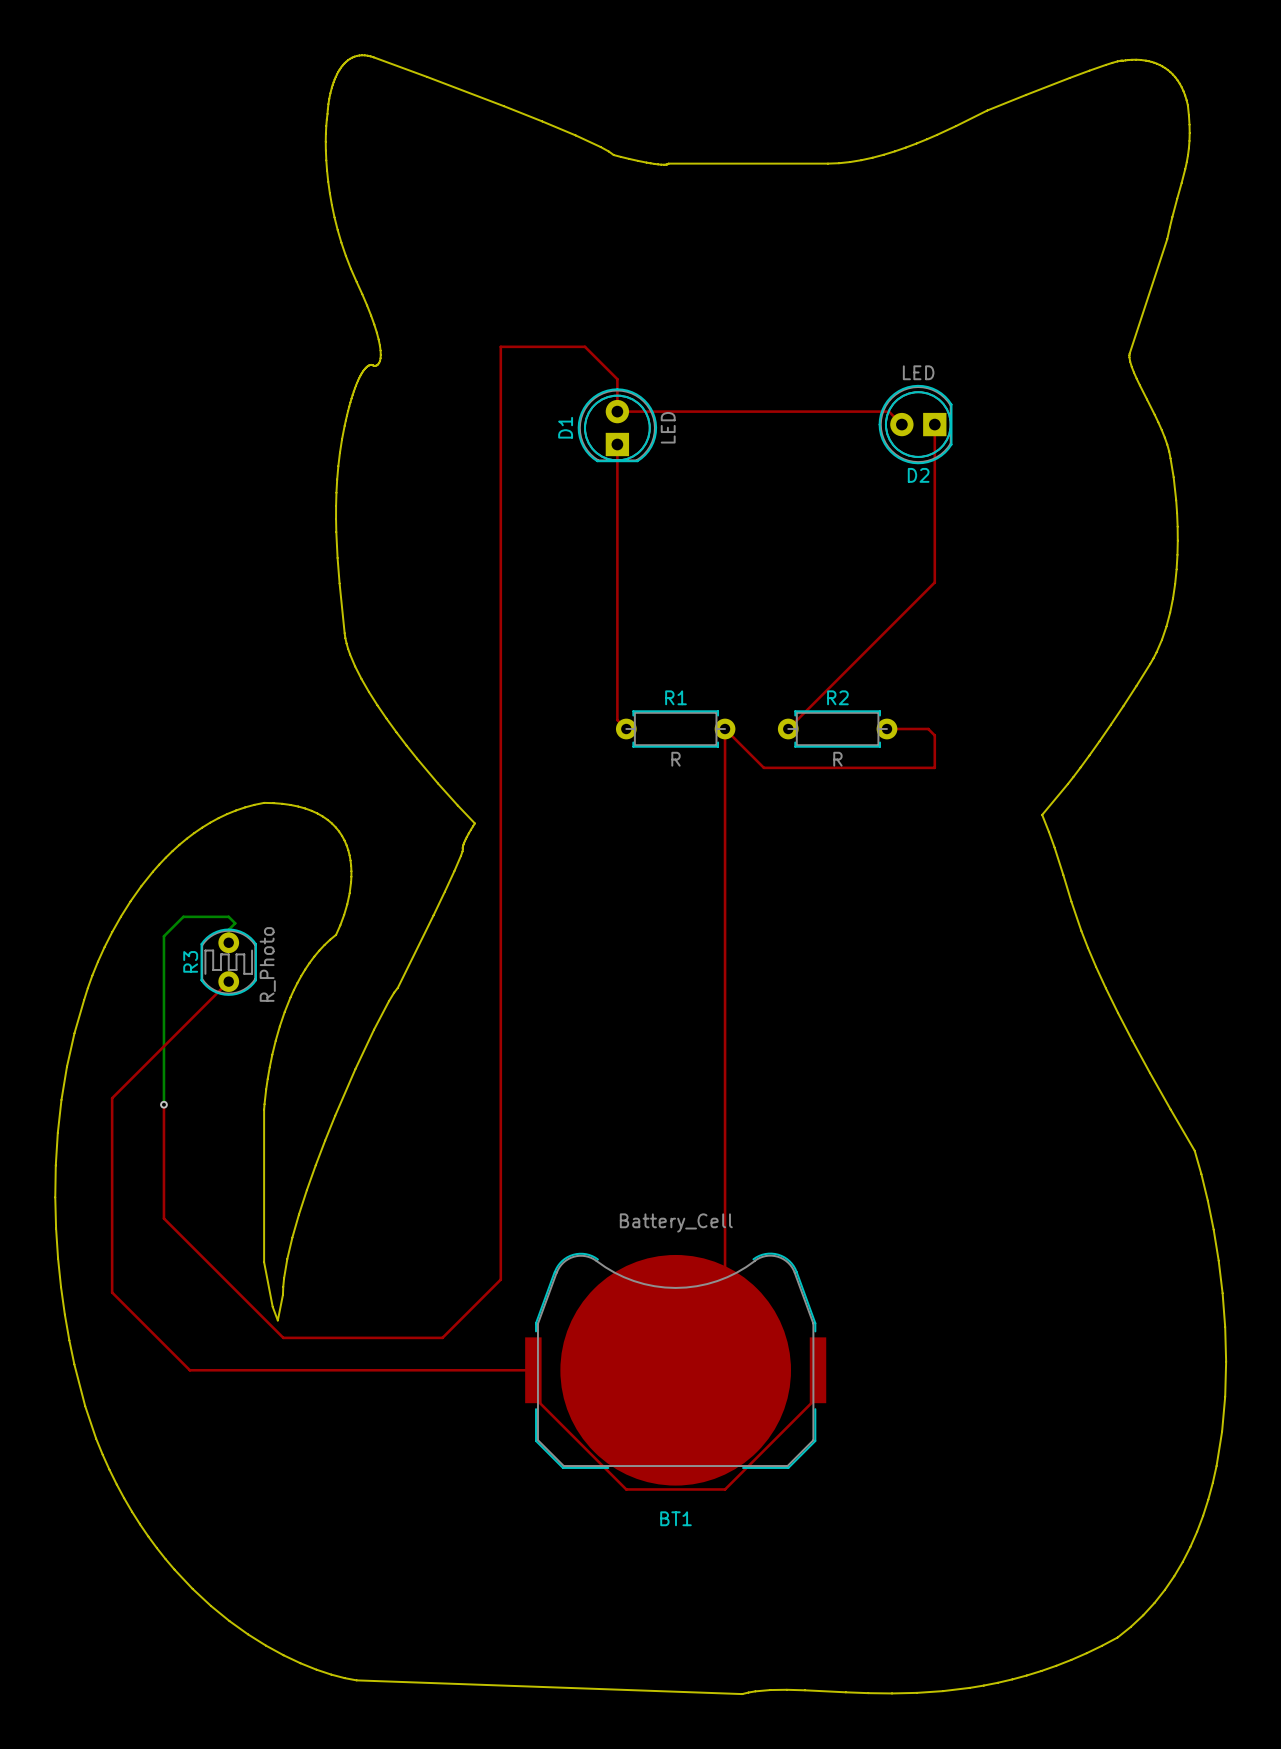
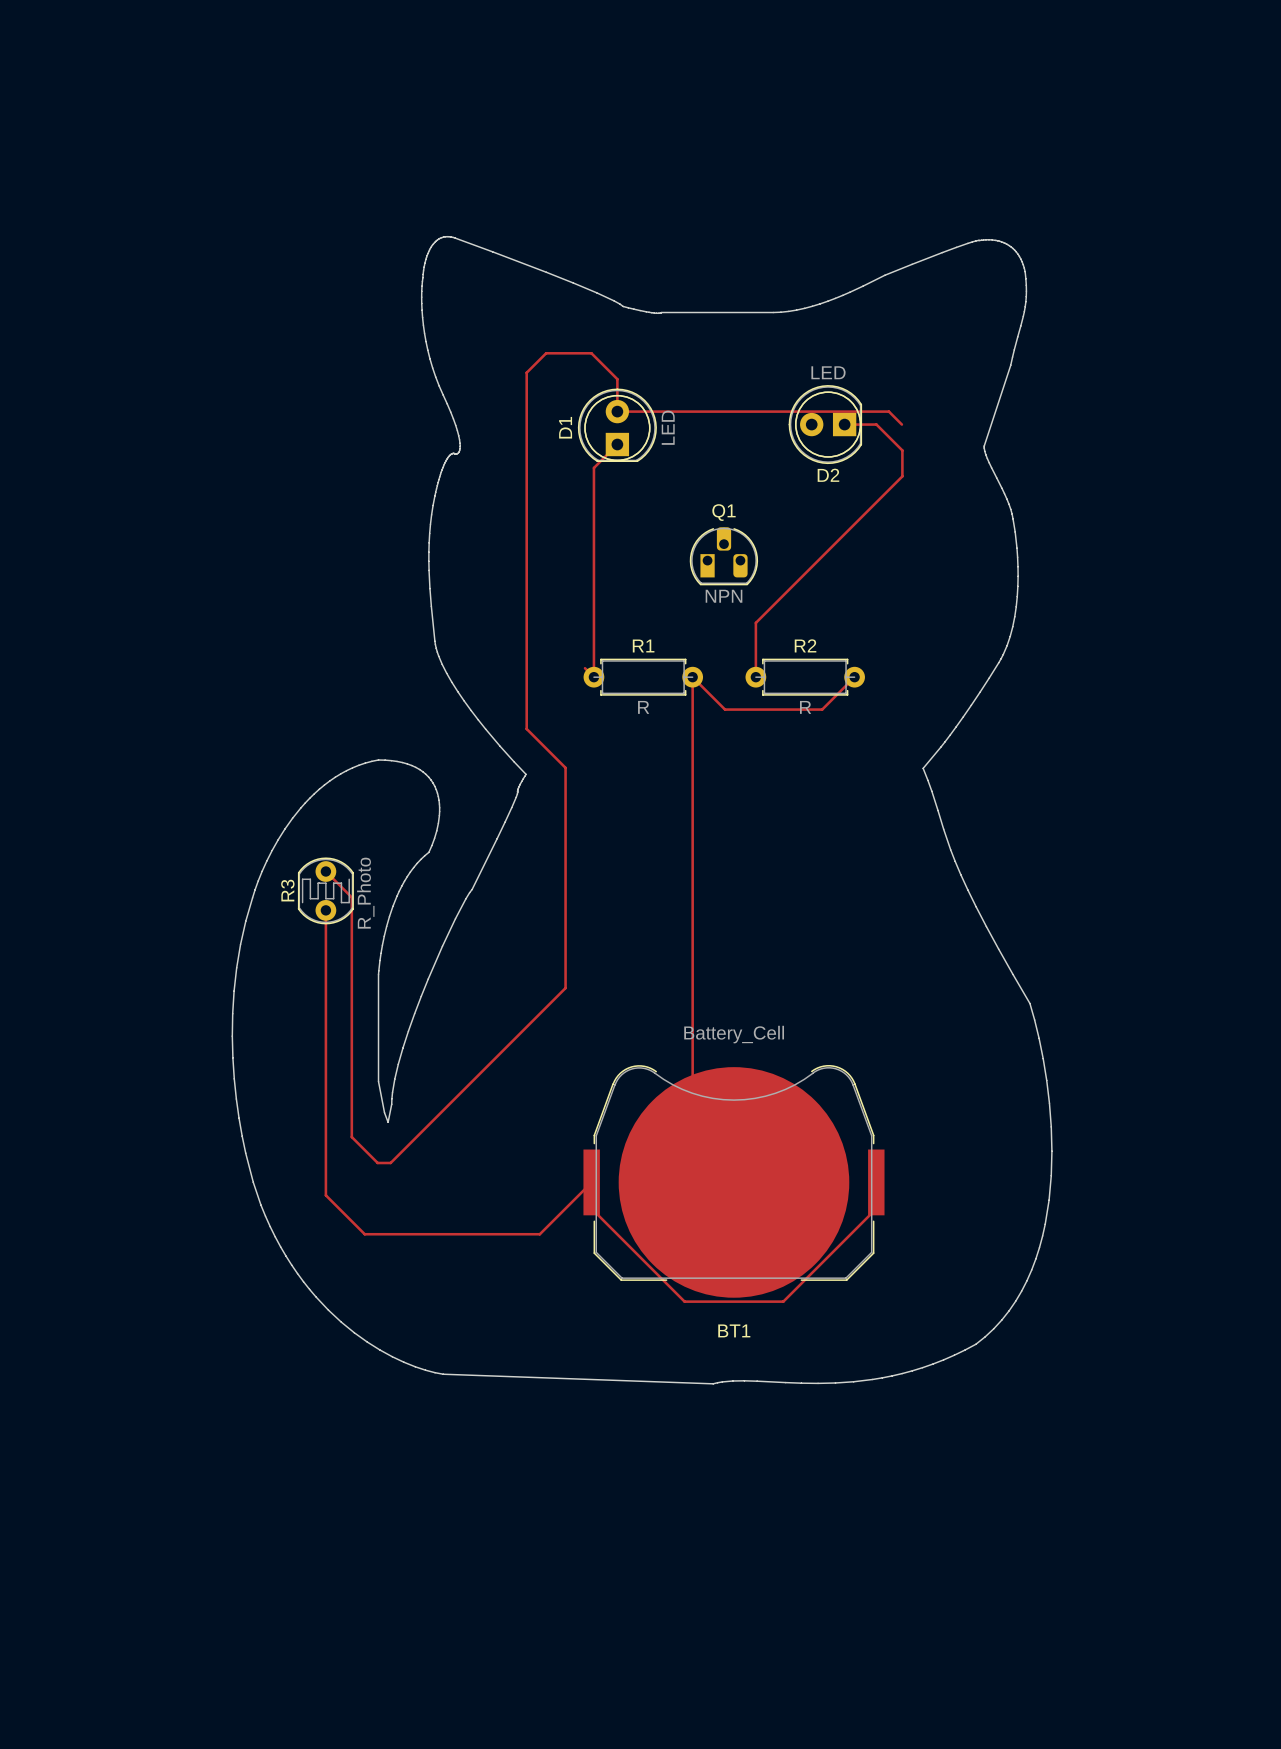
board edge: (362, 55) (354, 56) (346, 61) (335, 76) (329, 98) (325, 133) (327, 170) (334, 217) (345, 255) (374, 324) (380, 354) (378, 364) (366, 367) (357, 382) (346, 415) (339, 452) (336, 492) (336, 532) (344, 633) (355, 666) (386, 718) (417, 758) (474, 823) (464, 841) (460, 856) (433, 915) (355, 1069) (325, 1140) (292, 1237) (277, 1320) (272, 1306) (264, 1262) (264, 1109) (266, 1089) (275, 1040) (290, 997) (309, 962) (336, 934) (344, 914) (351, 876) (350, 860) (346, 845) (331, 823) (311, 810) (290, 804) (273, 803) (264, 802) (245, 807) (210, 822) (179, 844) (152, 871) (120, 916) (92, 975) (74, 1033) (61, 1099) (55, 1165) (58, 1258) (69, 1340) (85, 1406) (109, 1469) (132, 1511) (156, 1548) (174, 1569) (211, 1605) (247, 1634) (283, 1655) (316, 1669) (344, 1678) (356, 1680) (742, 1694) (786, 1689) (916, 1692) (970, 1687) (1012, 1679) (1056, 1665) (1086, 1653) (1117, 1637) (1143, 1615) (1164, 1589) (1182, 1561) (1197, 1531) (1212, 1482) (1222, 1431) (1225, 1396) (1225, 1327) (1218, 1260) (1207, 1200) (1194, 1150) (1132, 1040) (1096, 966) (1081, 930) (1042, 814) (1089, 755) (1150, 664) (1162, 639) (1173, 598) (1176, 569) (1177, 526) (1170, 458) (1164, 437) (1133, 372) (1129, 355) (1167, 239) (1186, 162) (1189, 124) (1187, 105) (1183, 91) (1172, 74) (1159, 64) (1140, 59) (1121, 60) (1069, 77) (987, 110) (916, 143) (872, 157) (827, 163) (661, 164) (613, 155) (575, 135) (504, 106) (373, 57) (362, 55) -> none
board edge: none -> (447, 236) (435, 241) (428, 251) (424, 267) (421, 291) (422, 317) (427, 350) (435, 376) (455, 425) (460, 446) (458, 453) (450, 454) (443, 466) (431, 514) (429, 570) (434, 641) (442, 664) (464, 701) (485, 729) (526, 774) (497, 838) (442, 946) (421, 996) (398, 1064) (388, 1122) (378, 1081) (379, 960) (386, 926) (397, 896) (410, 872) (428, 852) (434, 838) (439, 811) (436, 789) (426, 774) (411, 765) (385, 760) (365, 763) (340, 773) (319, 789) (300, 808) (278, 839) (258, 880) (245, 921) (236, 967) (232, 1013) (234, 1078) (242, 1136) (253, 1182) (270, 1226) (286, 1256) (303, 1281) (341, 1322) (367, 1342) (392, 1356) (434, 1372) (713, 1383) (744, 1380) (835, 1382) (872, 1379) (902, 1373) (954, 1355) (975, 1344) (993, 1328) (1009, 1310) (1021, 1291) (1031, 1270) (1042, 1236) (1051, 1175) (1051, 1126) (1046, 1080) (1039, 1038) (1029, 1003) (986, 926) (960, 874) (923, 768) (956, 726) (998, 662) (1007, 645) (1014, 616) (1017, 566) (1013, 518) (1008, 504) (987, 458) (984, 446) (1010, 365) (1024, 311) (1026, 285) (1022, 261) (1014, 250) (1005, 243) (992, 239) (978, 240) (884, 275) (835, 298) (804, 308) (773, 312) (656, 313) (623, 306) (596, 292) (546, 272) (447, 236)
top track: (591, 353) (585, 346) (500, 346) (500, 1279) (442, 1337) (283, 1337) (163, 1218) (163, 1104) -> (591, 353) (546, 353) (526, 372) (526, 729) (565, 767) (565, 988) (390, 1162) (377, 1162) (351, 1137) (351, 897) (325, 871)
top track: none -> (844, 424) (876, 424) (902, 450) (902, 476) (755, 622) (755, 677)
D2 position: (915, 424) -> (825, 424)
top track: (934, 424) (934, 582) (788, 729) -> none
top track: (617, 444) (617, 720) (626, 729) -> (617, 444) (593, 467) (593, 677) (585, 668)
Q1: none -> NPN (723, 556)
top track: none -> (854, 677) (822, 709) (725, 709) (692, 677) (692, 1141) (733, 1182)
R1 position: (675, 729) -> (643, 677)
R2 position: (837, 729) -> (805, 677)
top track: (886, 729) (928, 729) (934, 735) (934, 767) (763, 767) (725, 729) (725, 1320) (675, 1370) -> none
top track: none -> (325, 910) (325, 1195) (364, 1234) (539, 1234) (591, 1182) (591, 1208) (684, 1301) (783, 1301) (876, 1208) (876, 1182)
bottom track: (228, 942) (228, 929) (235, 923) (228, 916) (183, 916) (163, 936) (163, 1104) -> none
R3 position: (228, 962) -> (325, 890)
top track: (228, 981) (112, 1098) (112, 1292) (189, 1370) (533, 1370) (533, 1396) (626, 1489) (725, 1489) (818, 1396) (818, 1370) -> none
via: (163, 1104) -> none
BT1 position: (675, 1369) -> (733, 1181)

